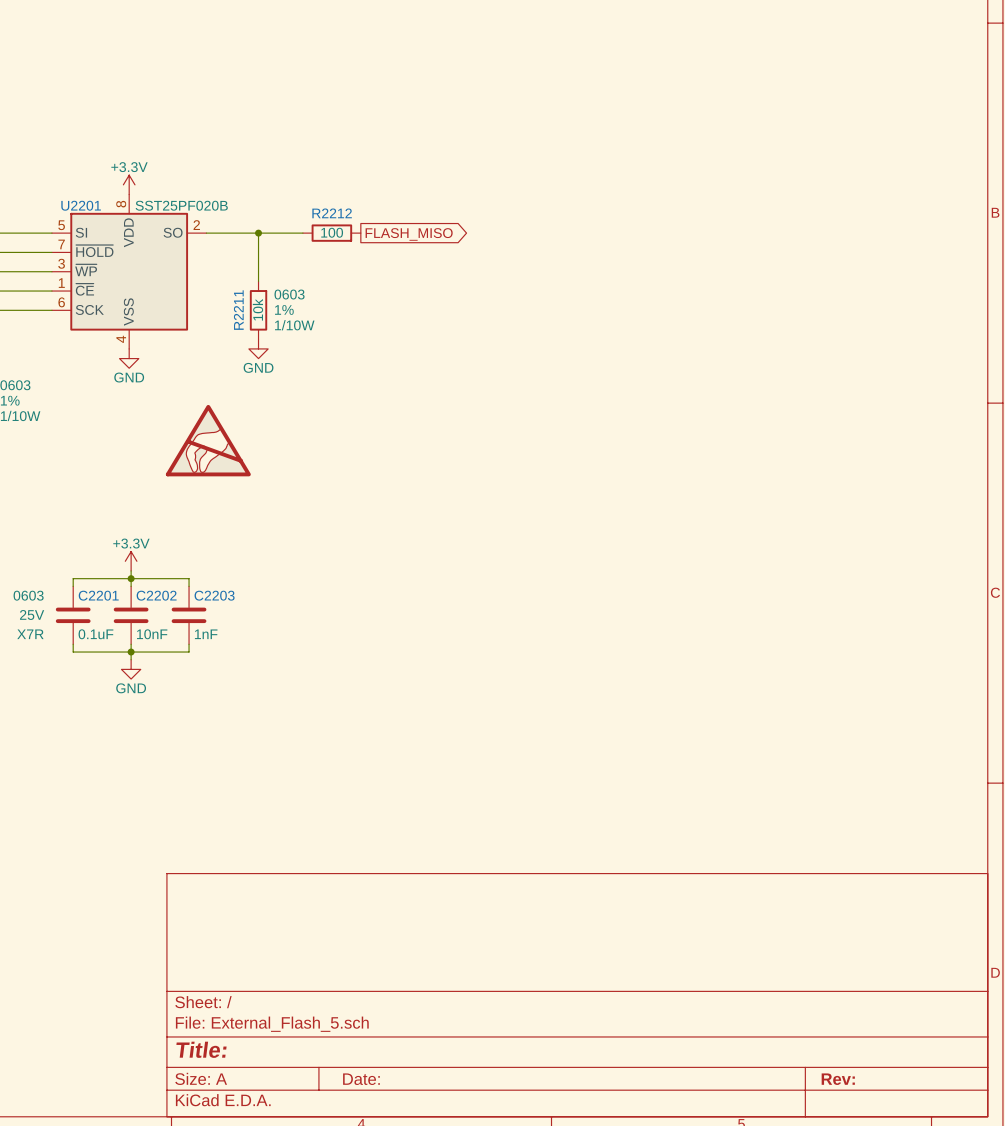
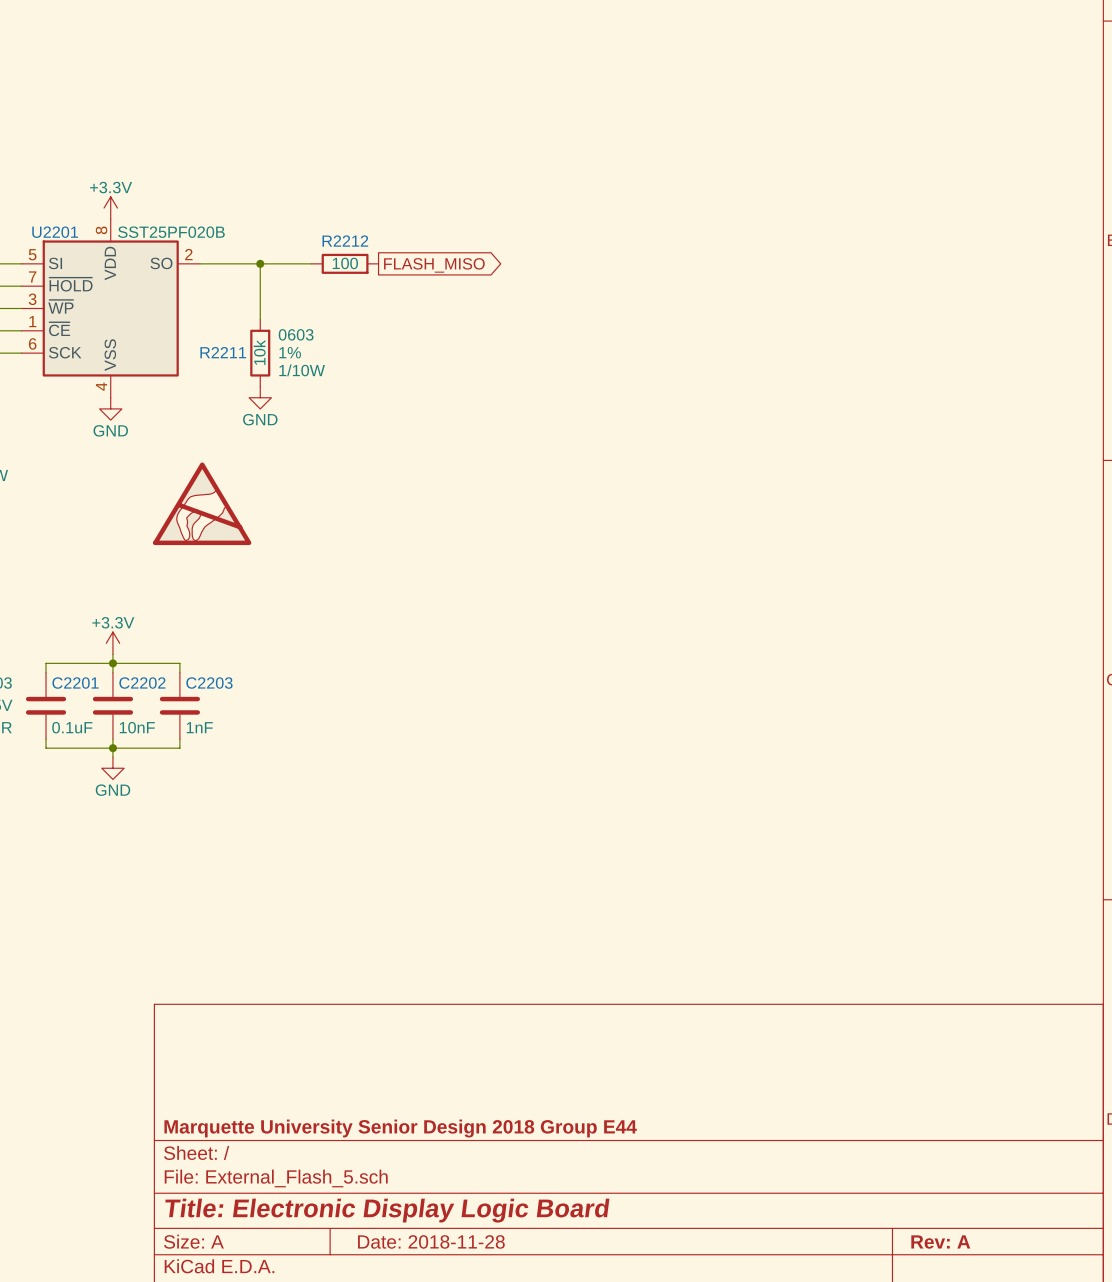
R2211 name rotation: 0° (238, 310) -> 90° clockwise (223, 352)
title block: none -> Marquette University Senior Design 2018 Group E44 (400, 1128)
title block: Title: (201, 1049) -> Title: Electronic Display Logic Board (387, 1210)
title block: Date: (361, 1079) -> Date: 2018-11-28 (431, 1241)
title block: Rev: (838, 1079) -> Rev: A (940, 1242)

